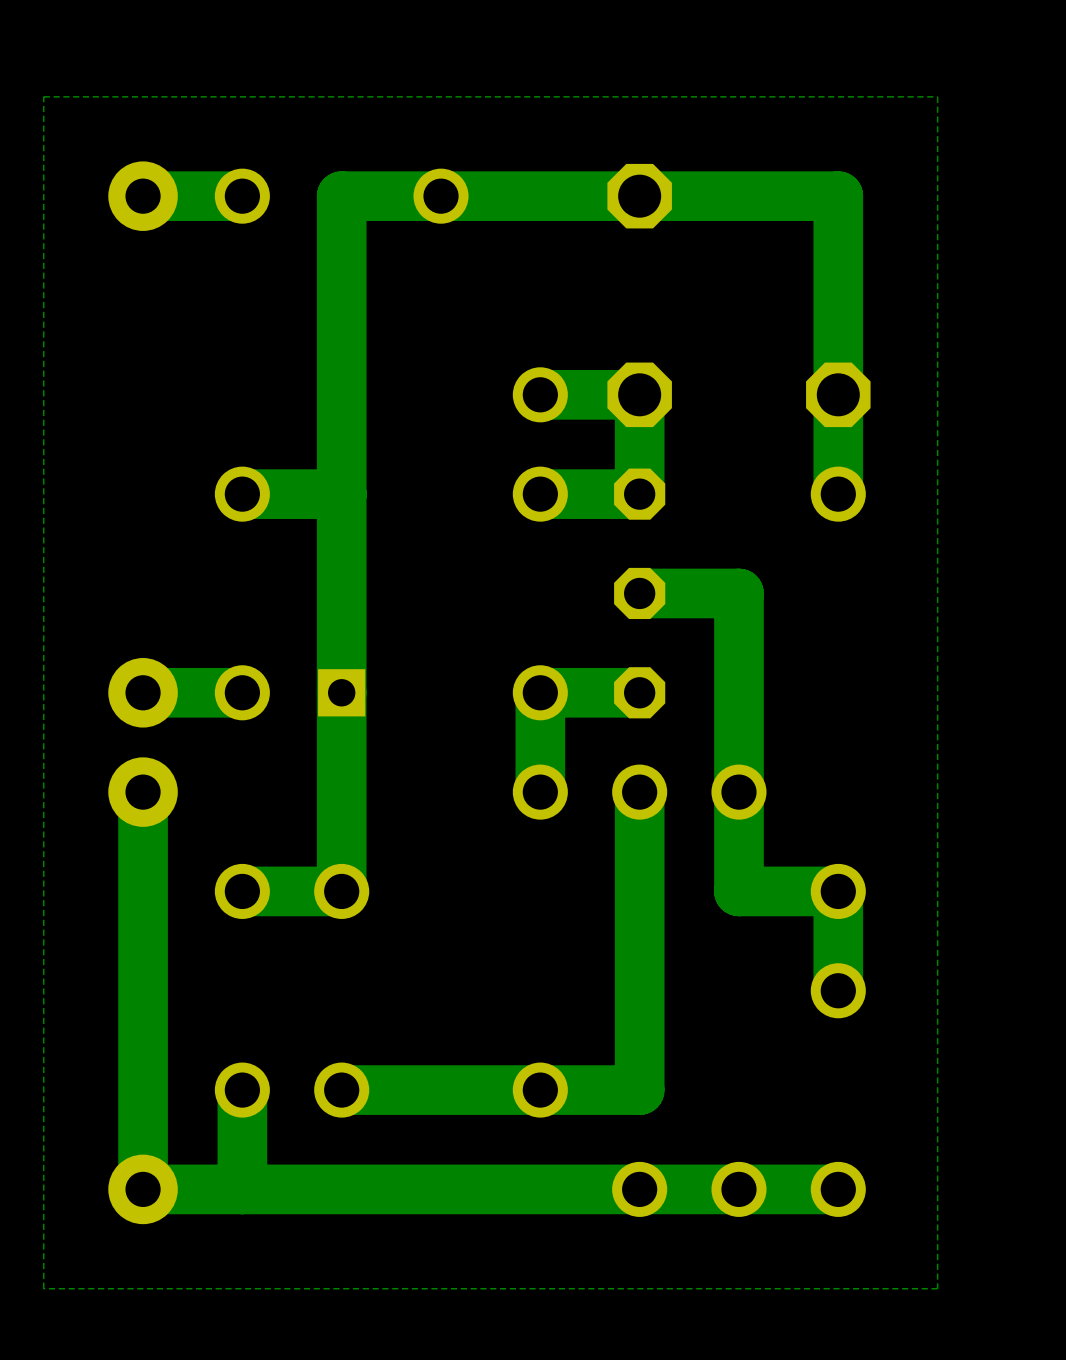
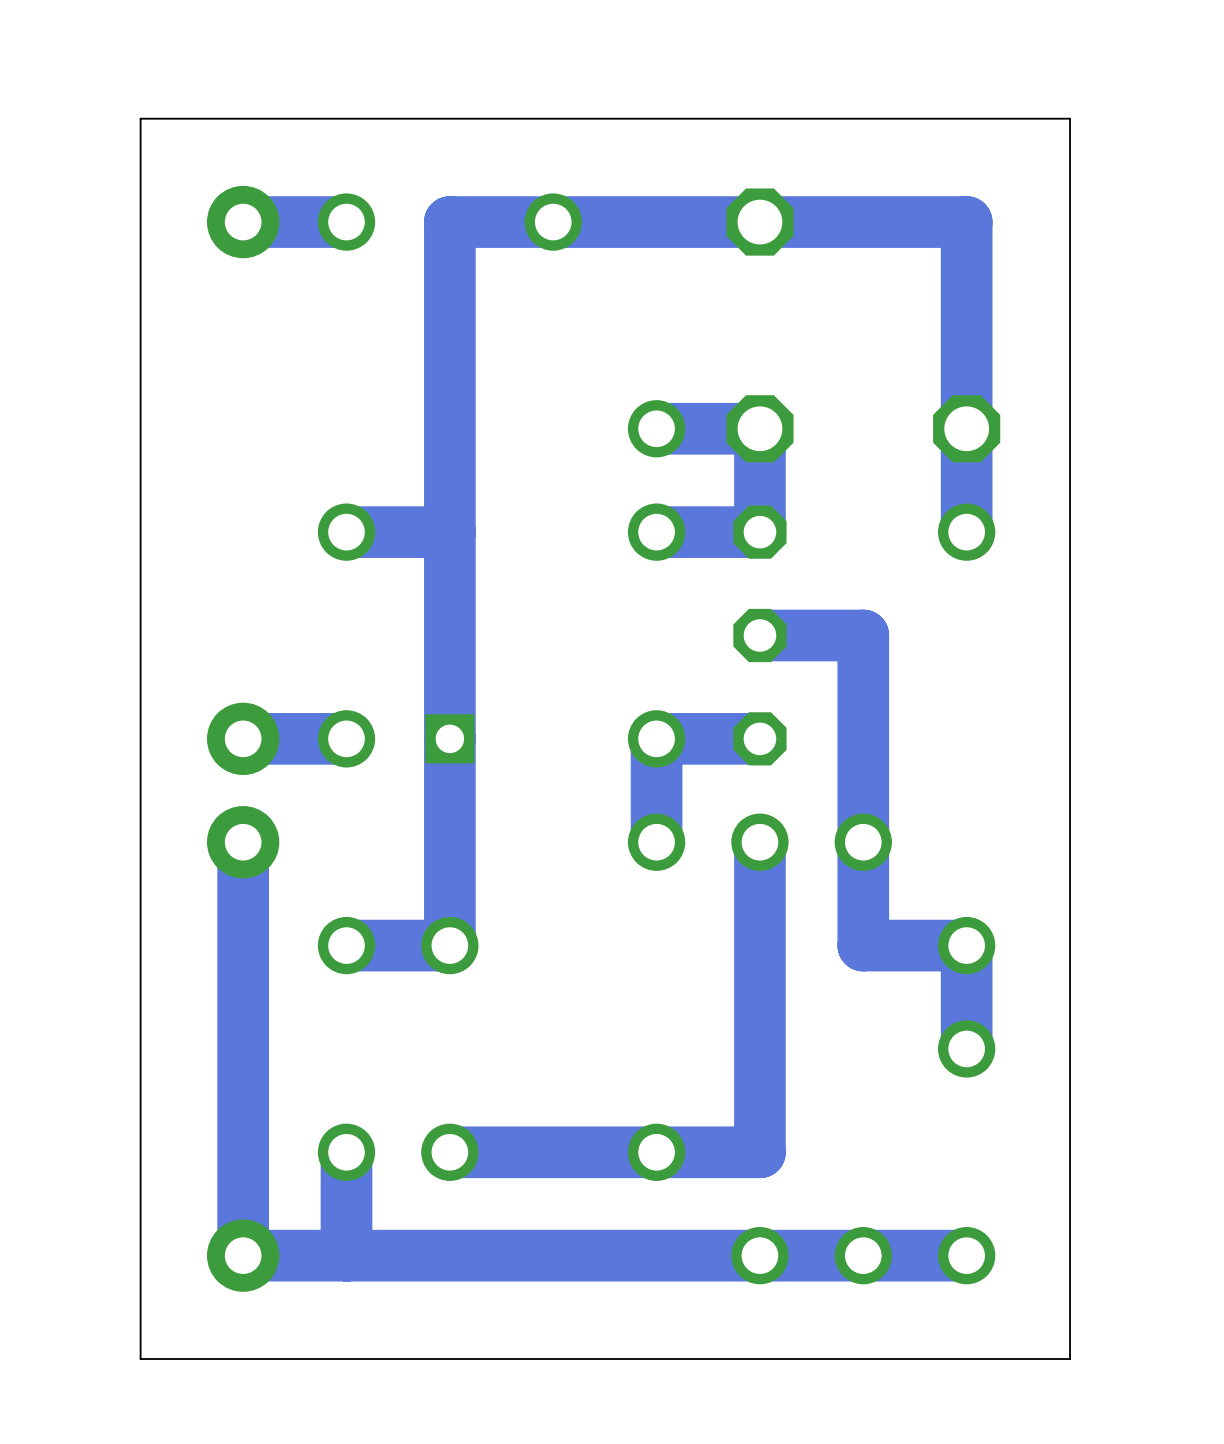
bottom zone outline: (937, 96) (937, 1288) (43, 1288) (43, 96) (937, 96) -> none
board edge: none -> (1070, 118) (140, 118) (140, 1359) (1070, 1359) (1070, 118)

